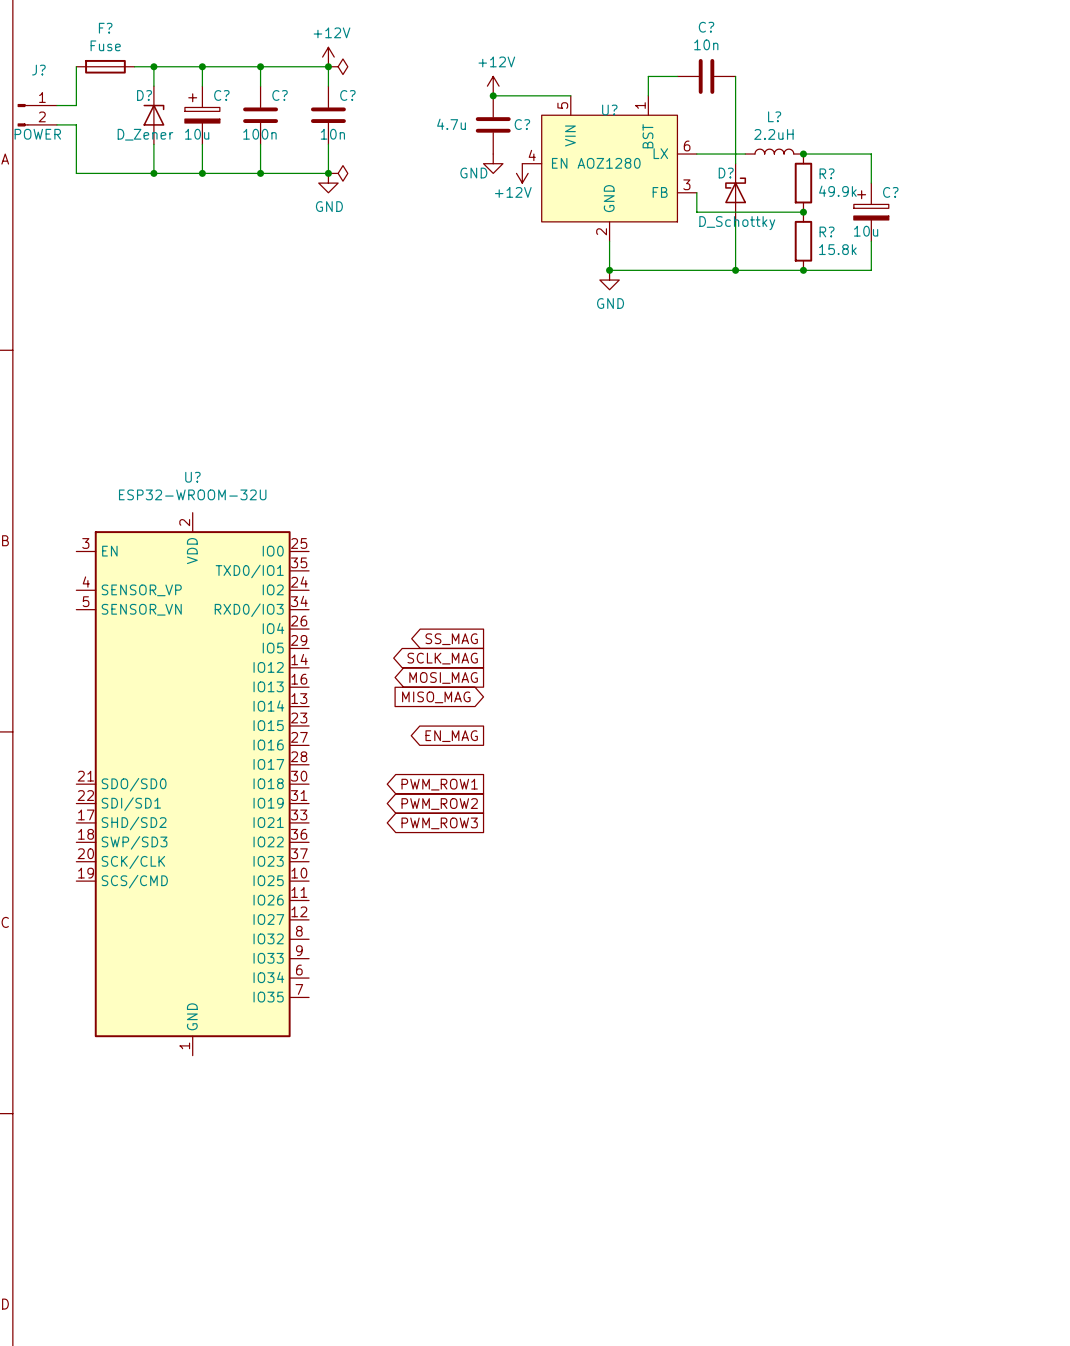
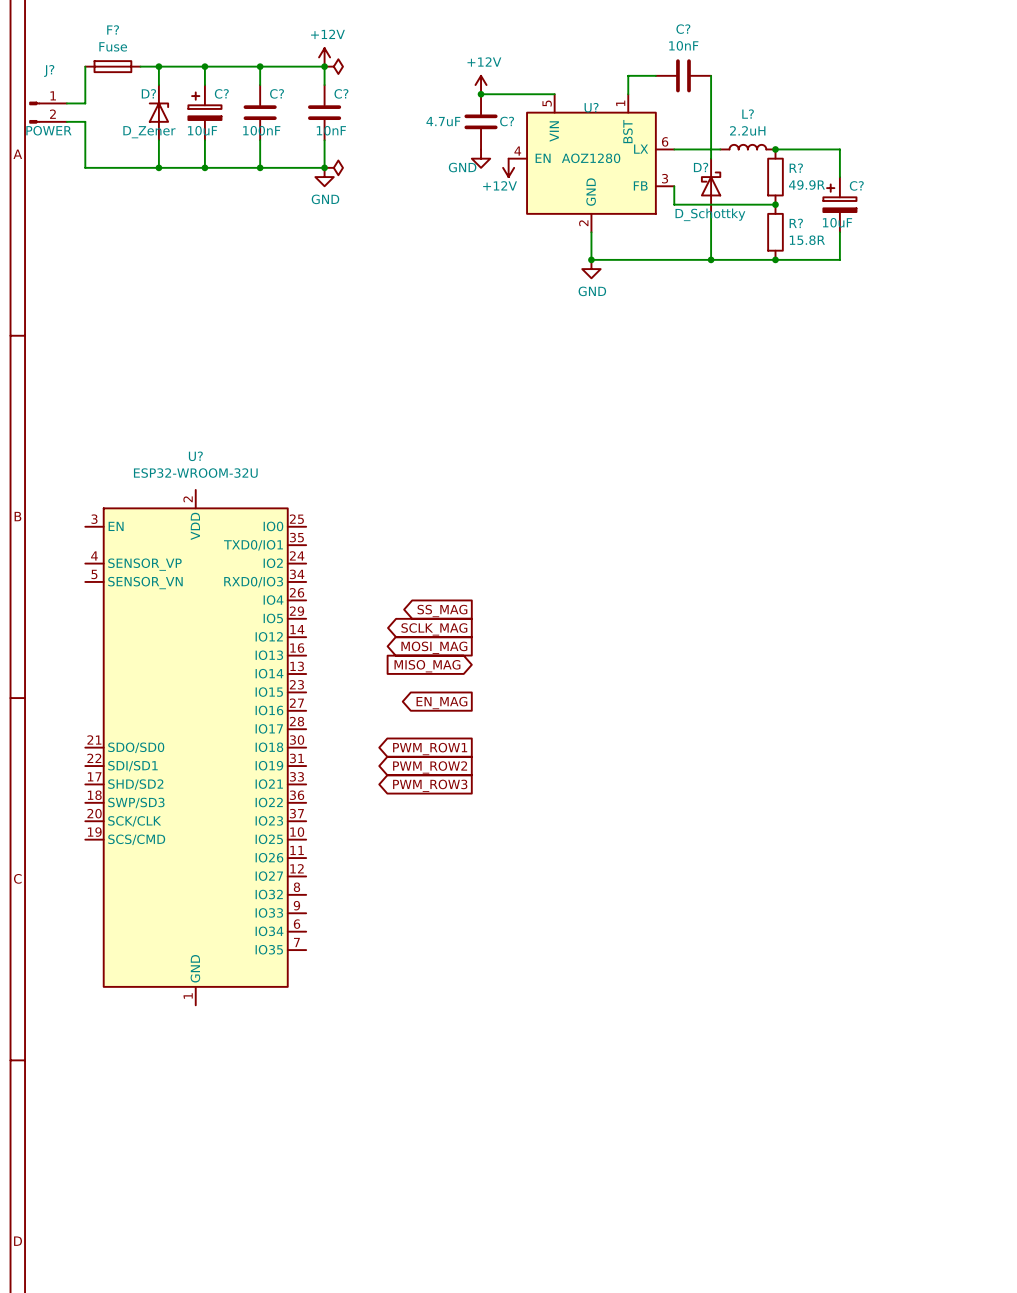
C? value: 10n (706, 44) -> 10nF (683, 45)
C? value: 4.7u (451, 124) -> 4.7uF (443, 121)
C? value: 10u (197, 134) -> 10uF (202, 130)
C? value: 100n (259, 134) -> 100nF (261, 130)
C? value: 10n (332, 134) -> 10nF (331, 130)
R? value: 49.9k (837, 191) -> 49.9R (806, 185)
C? value: 10u (866, 231) -> 10uF (837, 222)
R? value: 15.8k (837, 249) -> 15.8R (807, 240)

